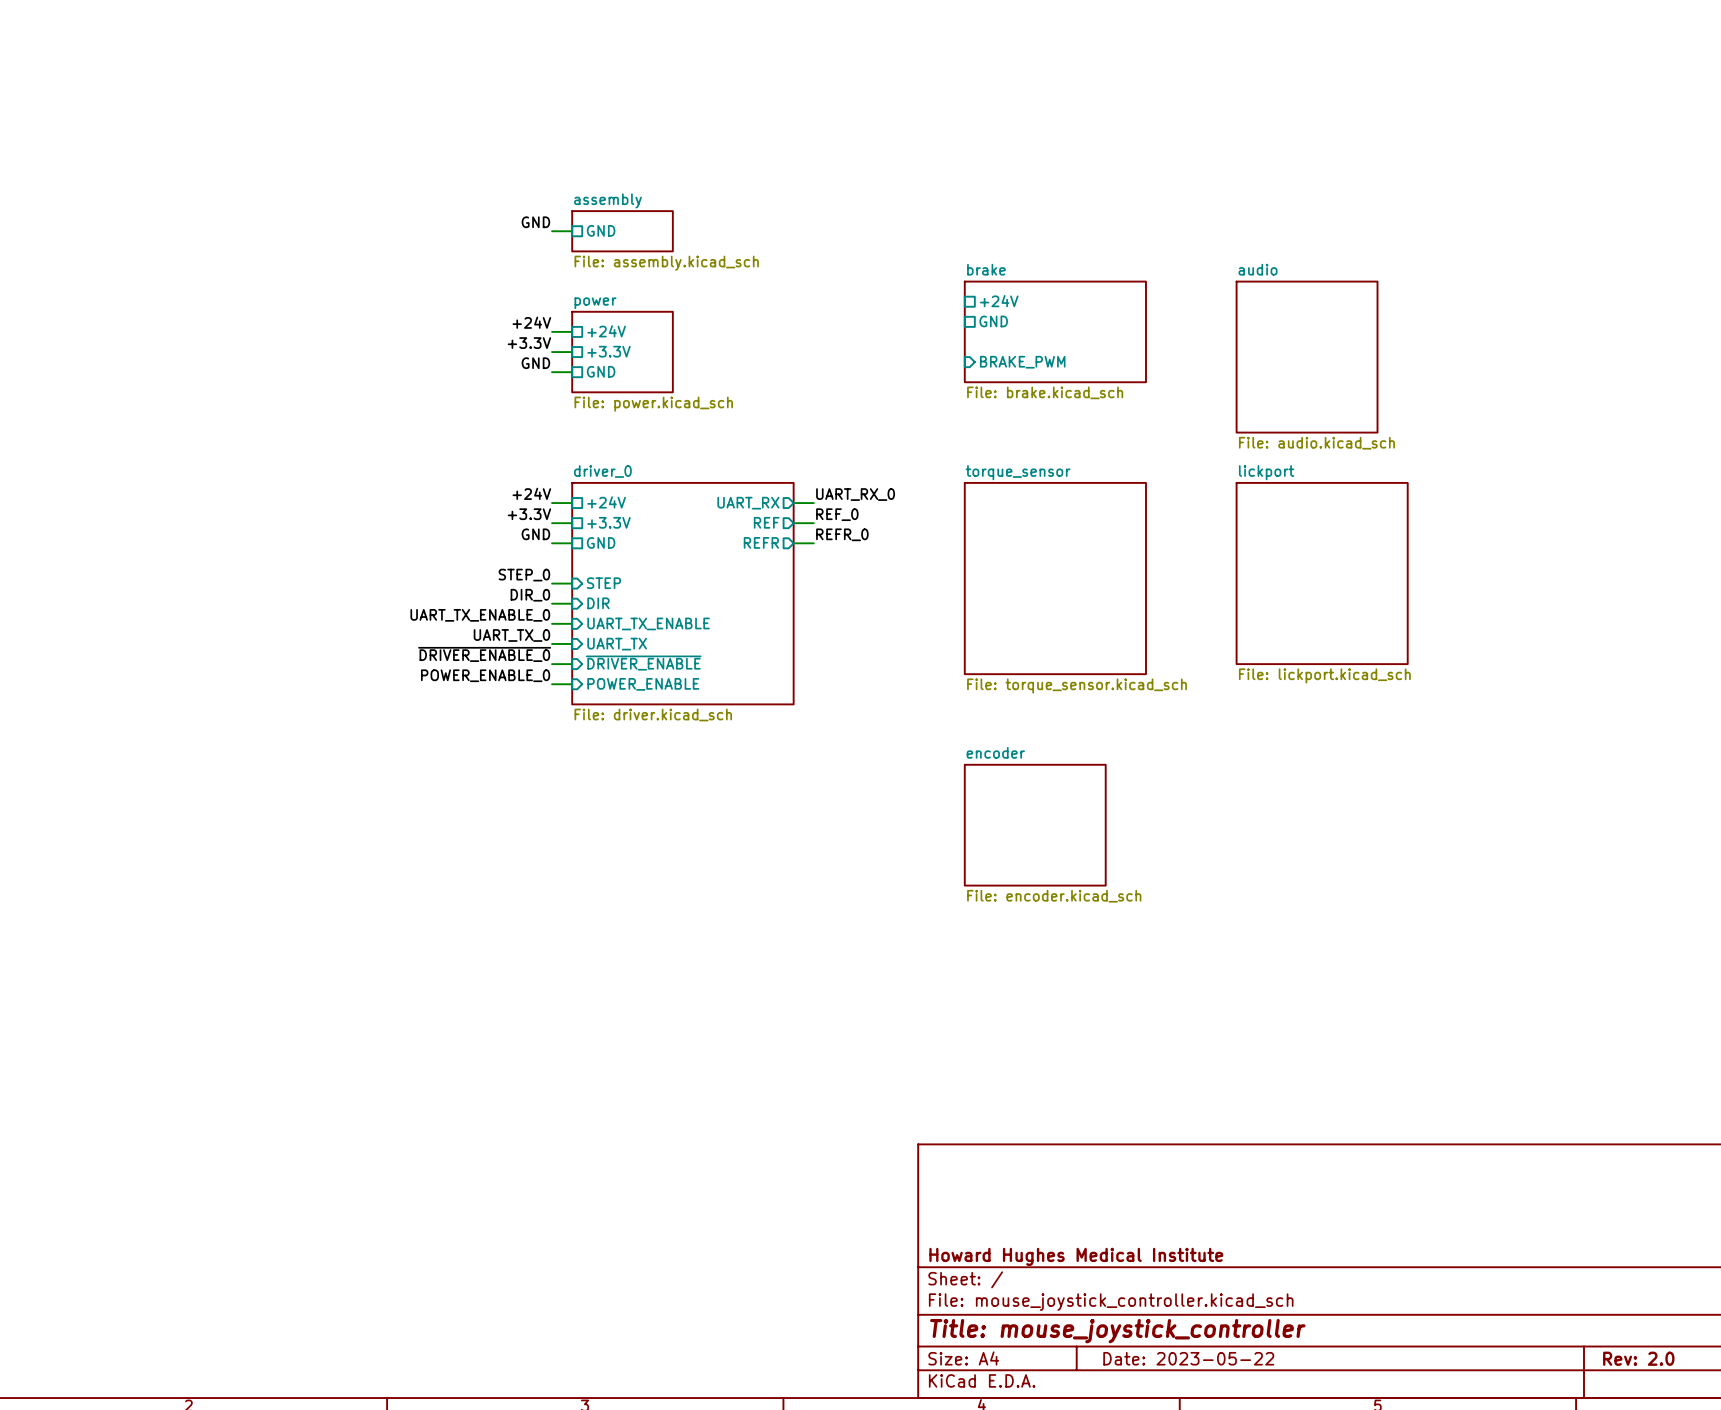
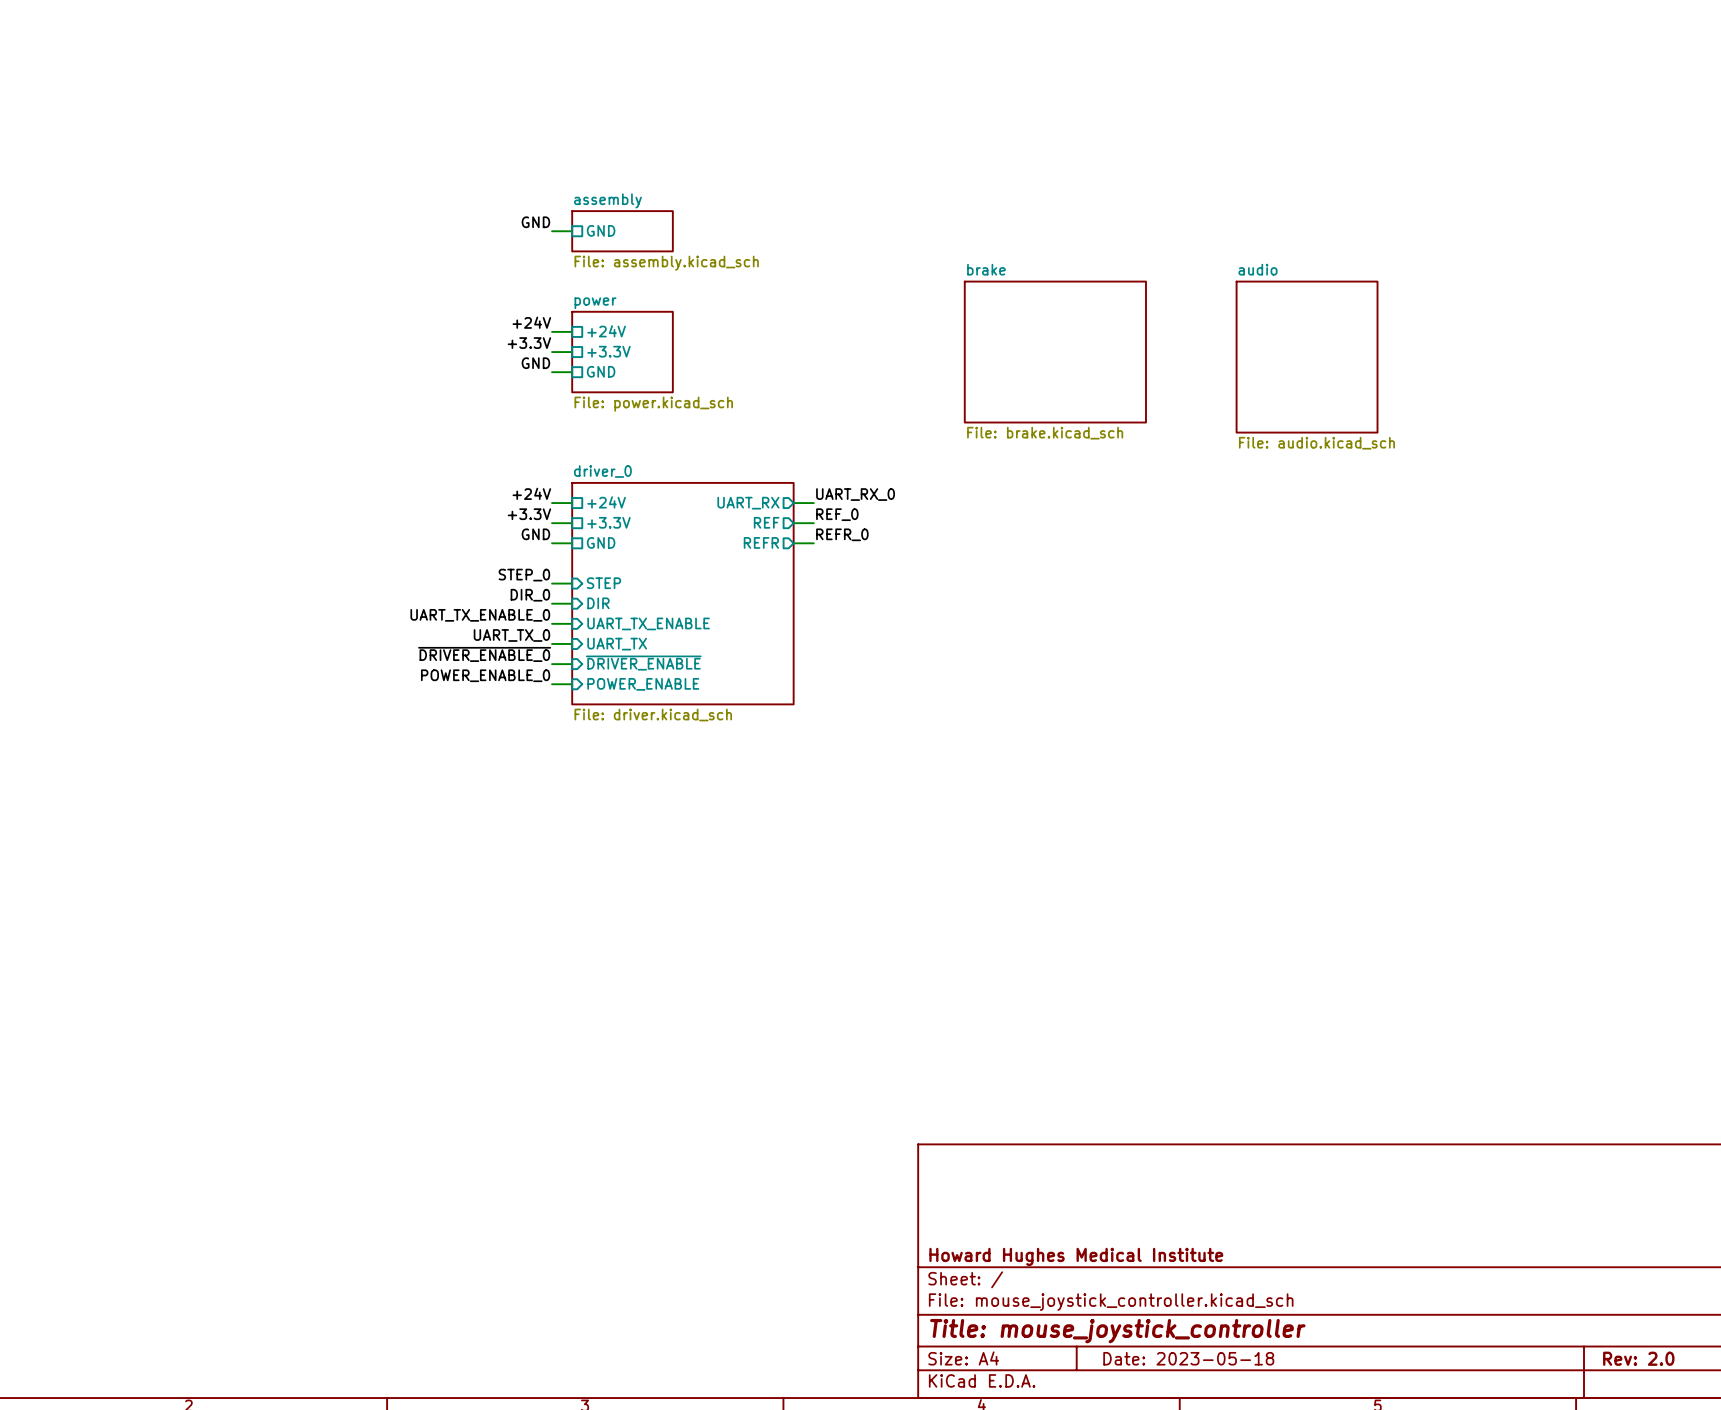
sheet pin: +24V (999, 301) -> none
sheet pin: GND (993, 321) -> none
sheet brake: File: brake.kicad_sch (1055, 331) -> none
sheet brake: none -> File: brake.kicad_sch (1055, 352)
sheet pin: BRAKE_PWM (1022, 362) -> none
sheet lickport: File: lickport.kicad_sch (1322, 573) -> none
sheet torque_sensor: File: torque_sensor.kicad_sch (1055, 578) -> none
sheet encoder: File: encoder.kicad_sch (1035, 825) -> none
title block: Date: 2023-05-22 (1188, 1358) -> Date: 2023-05-18 (1188, 1358)

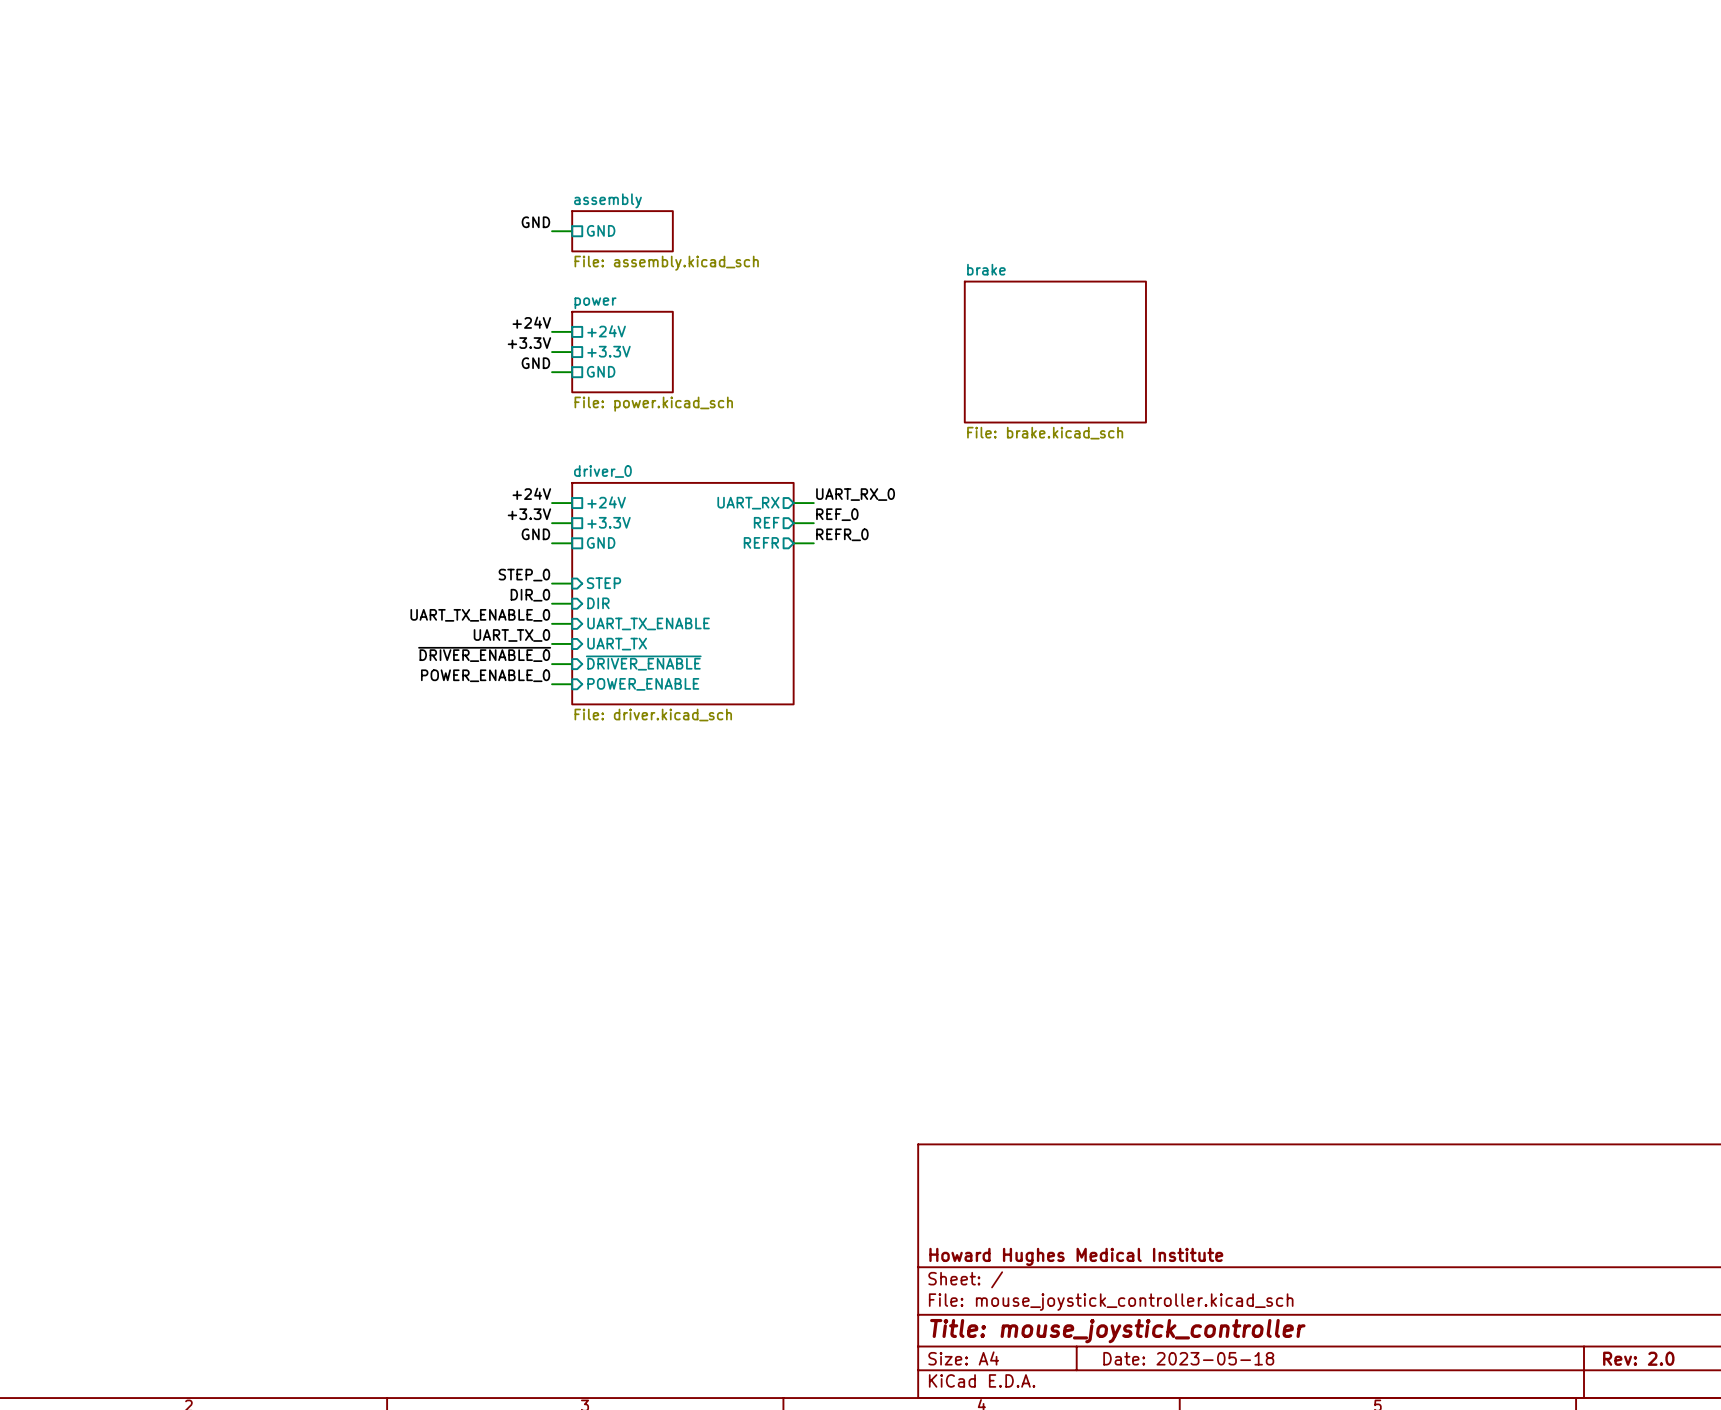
sheet audio: File: audio.kicad_sch (1307, 357) -> none

